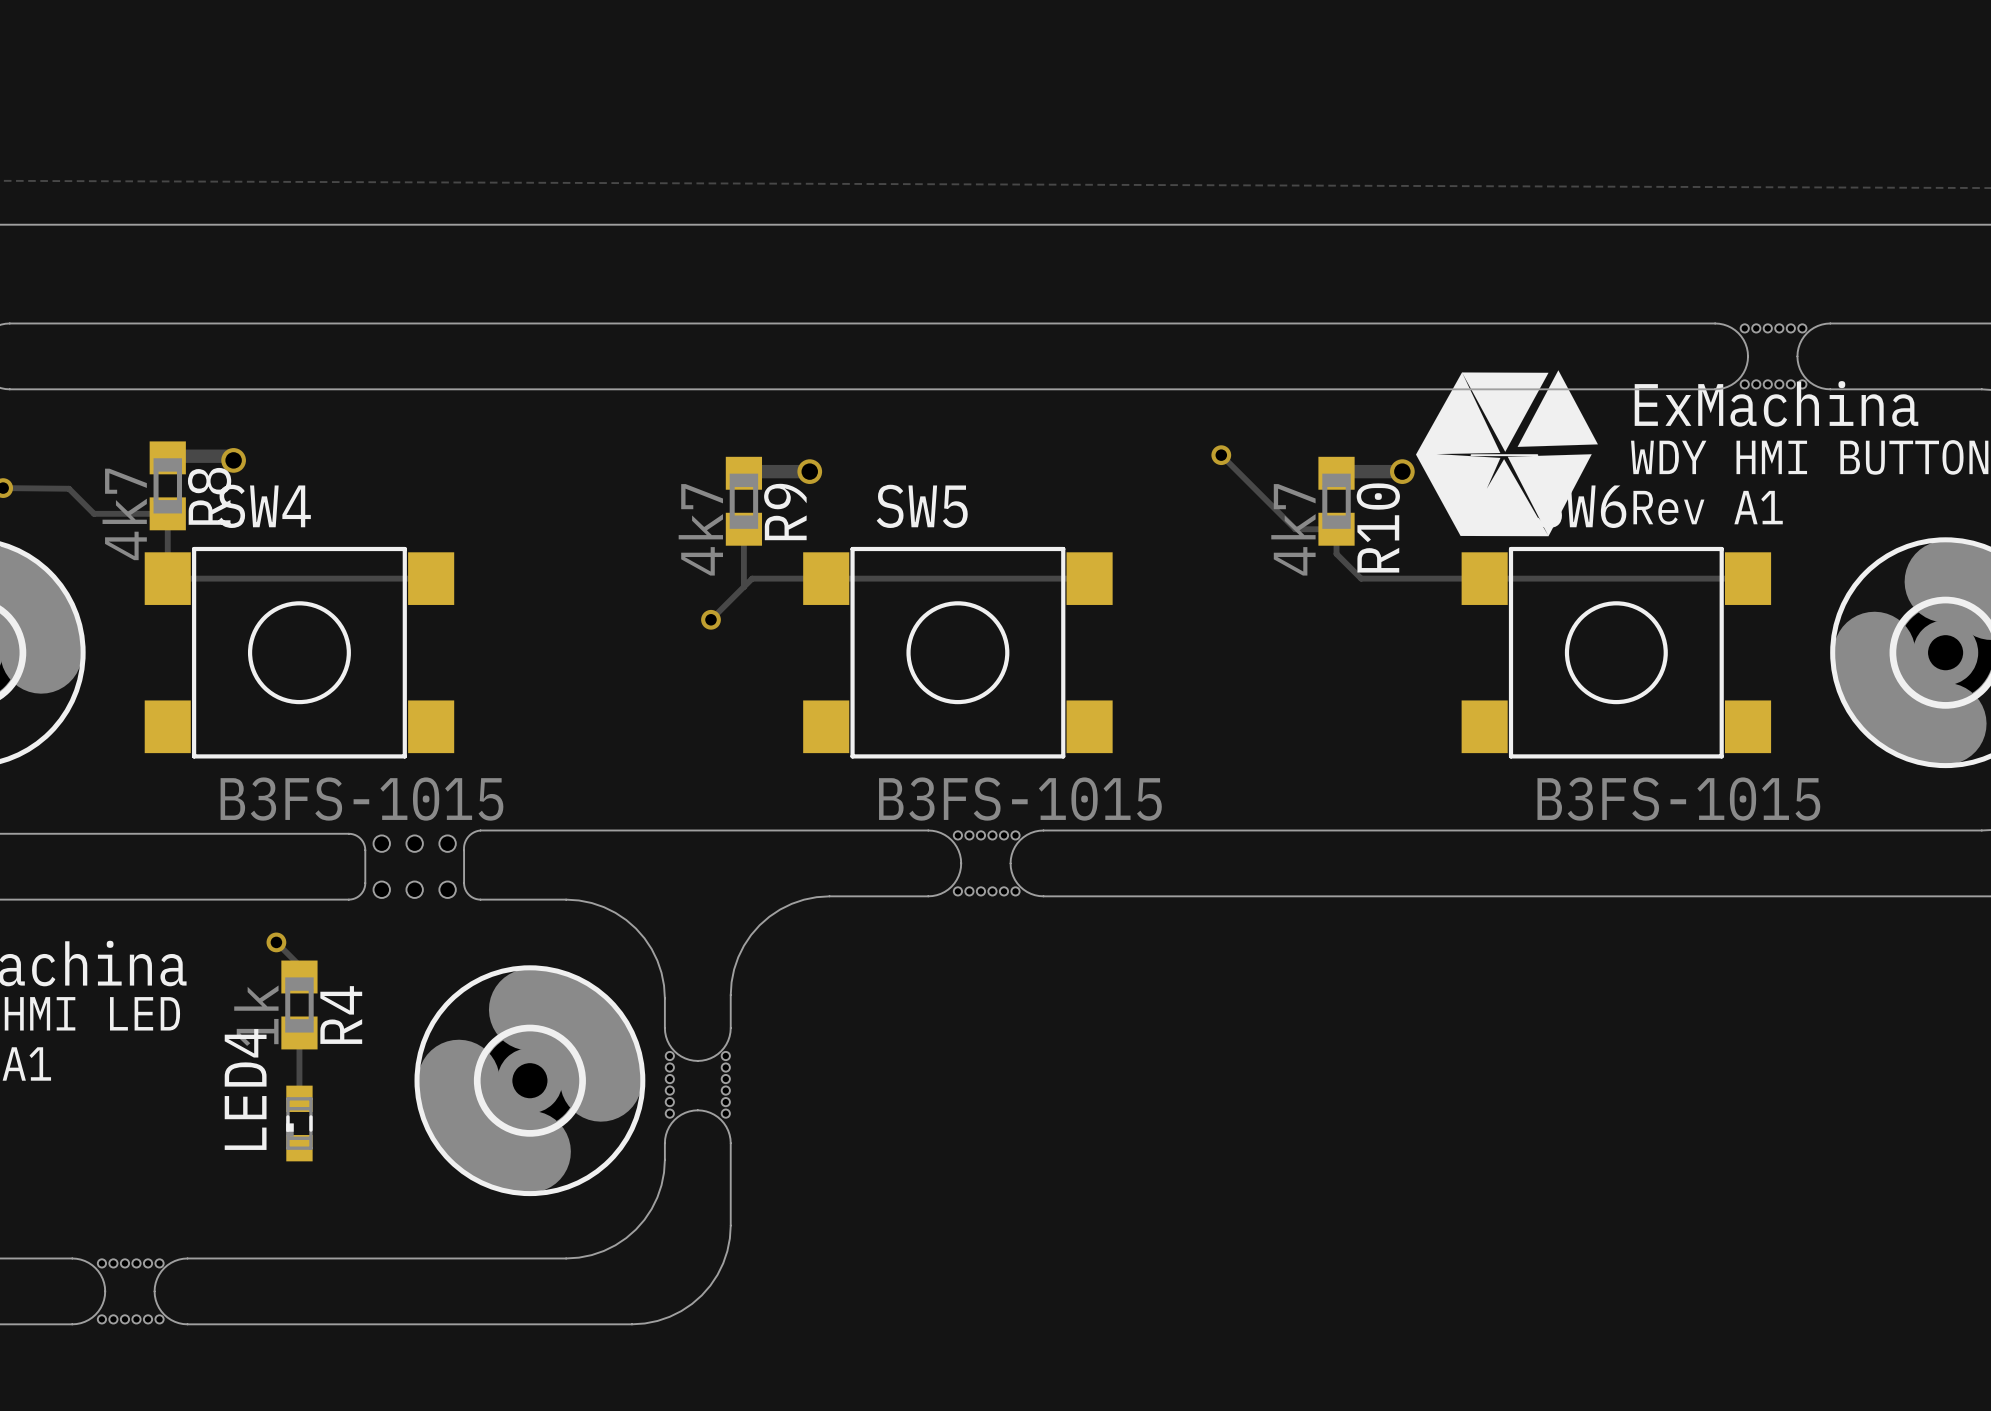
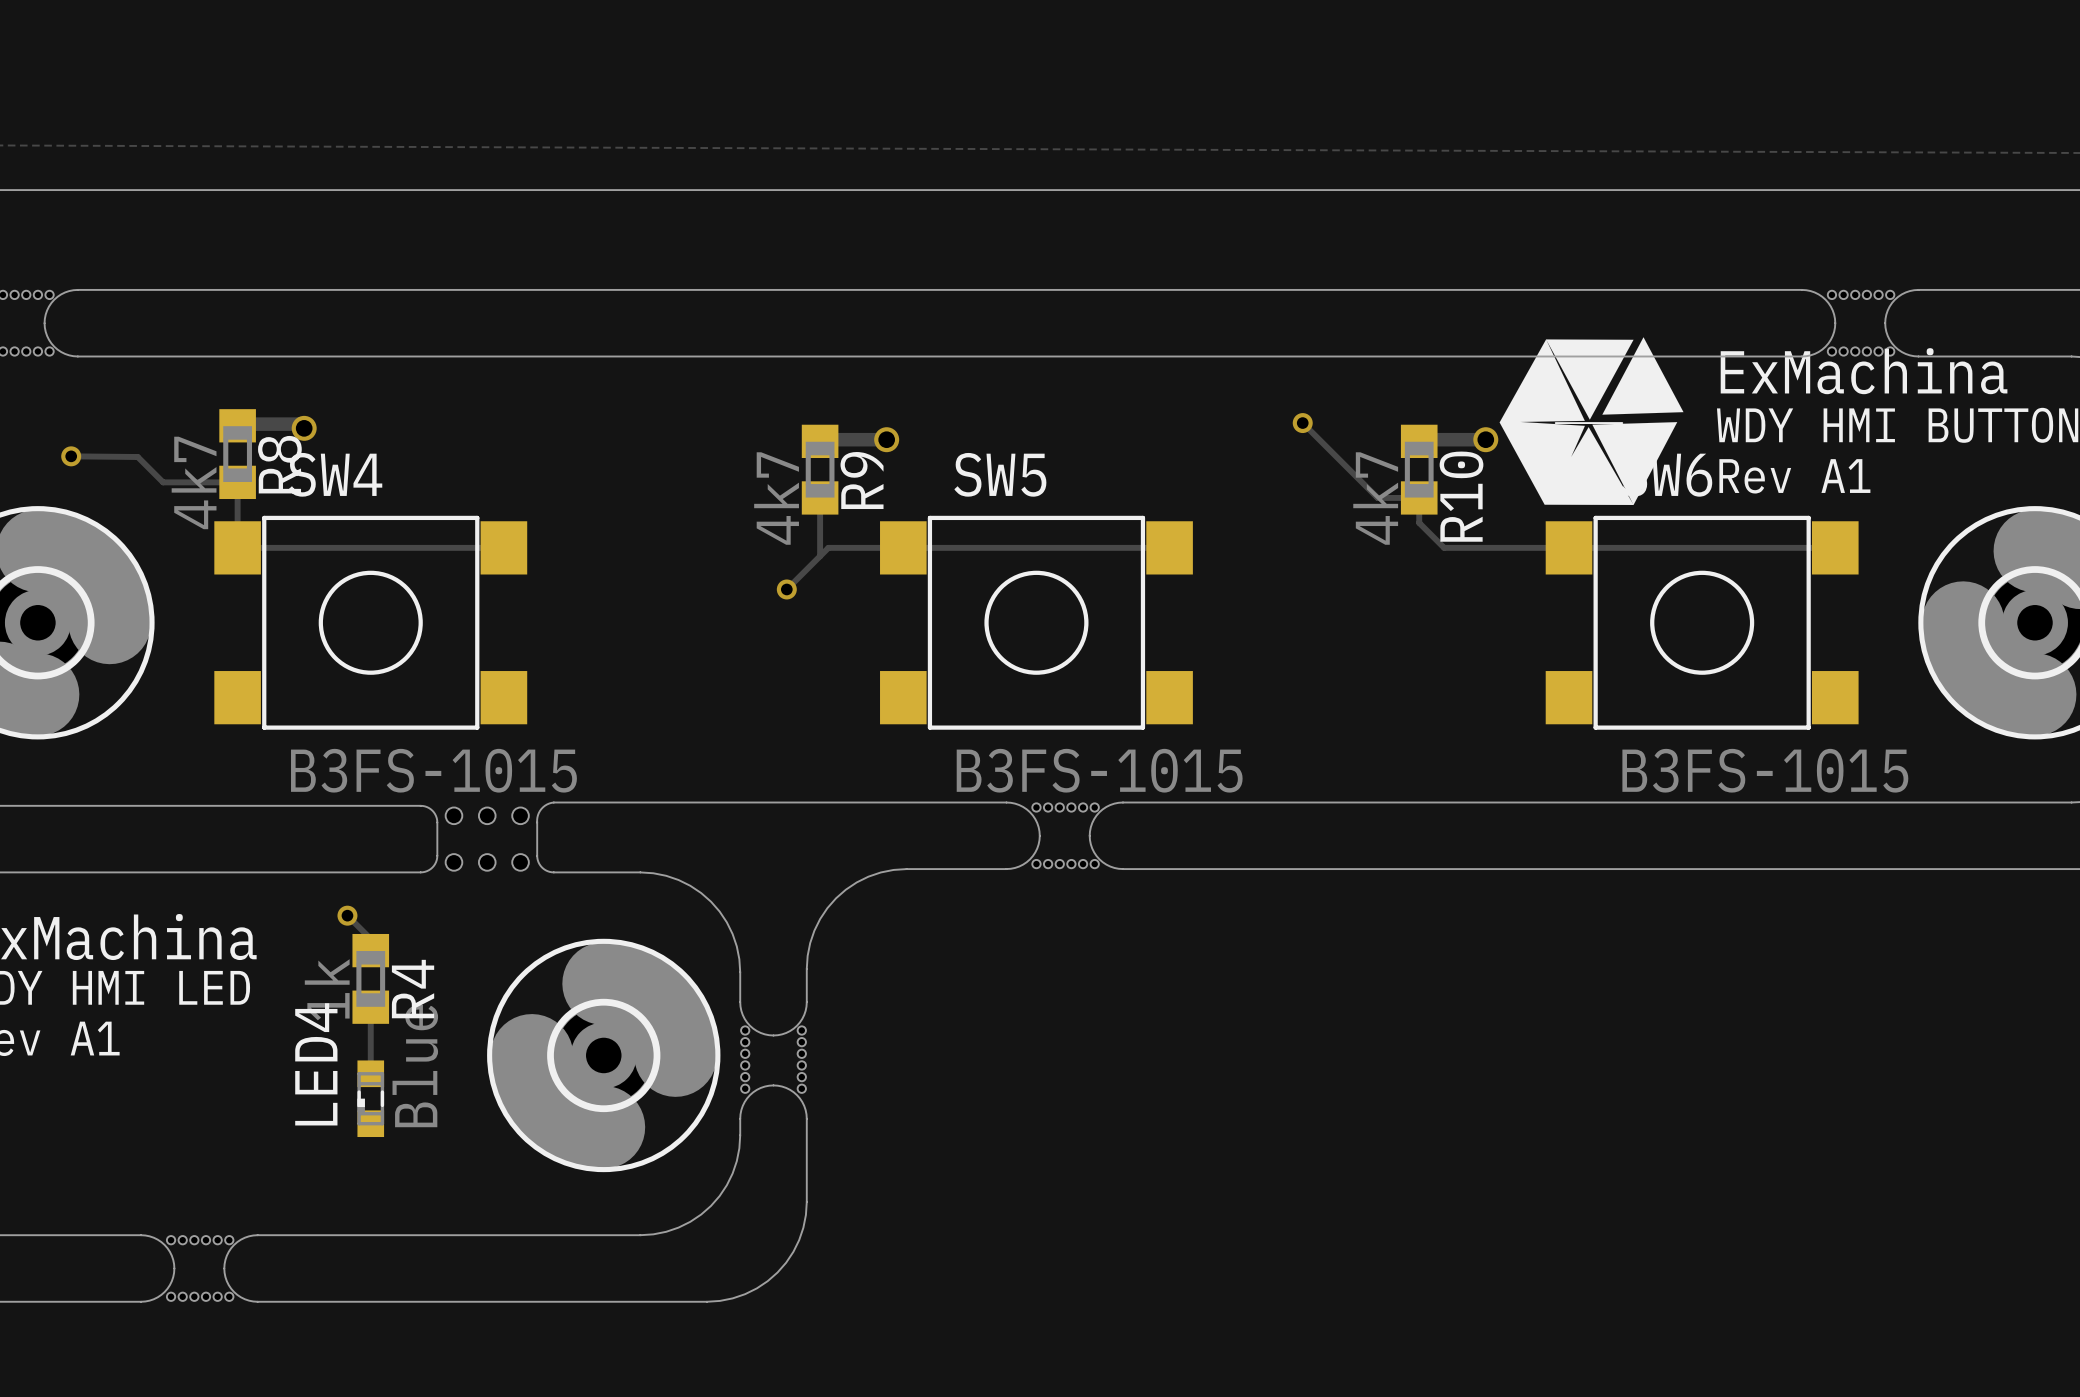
LED4 value: none -> Blue (415, 1066)

